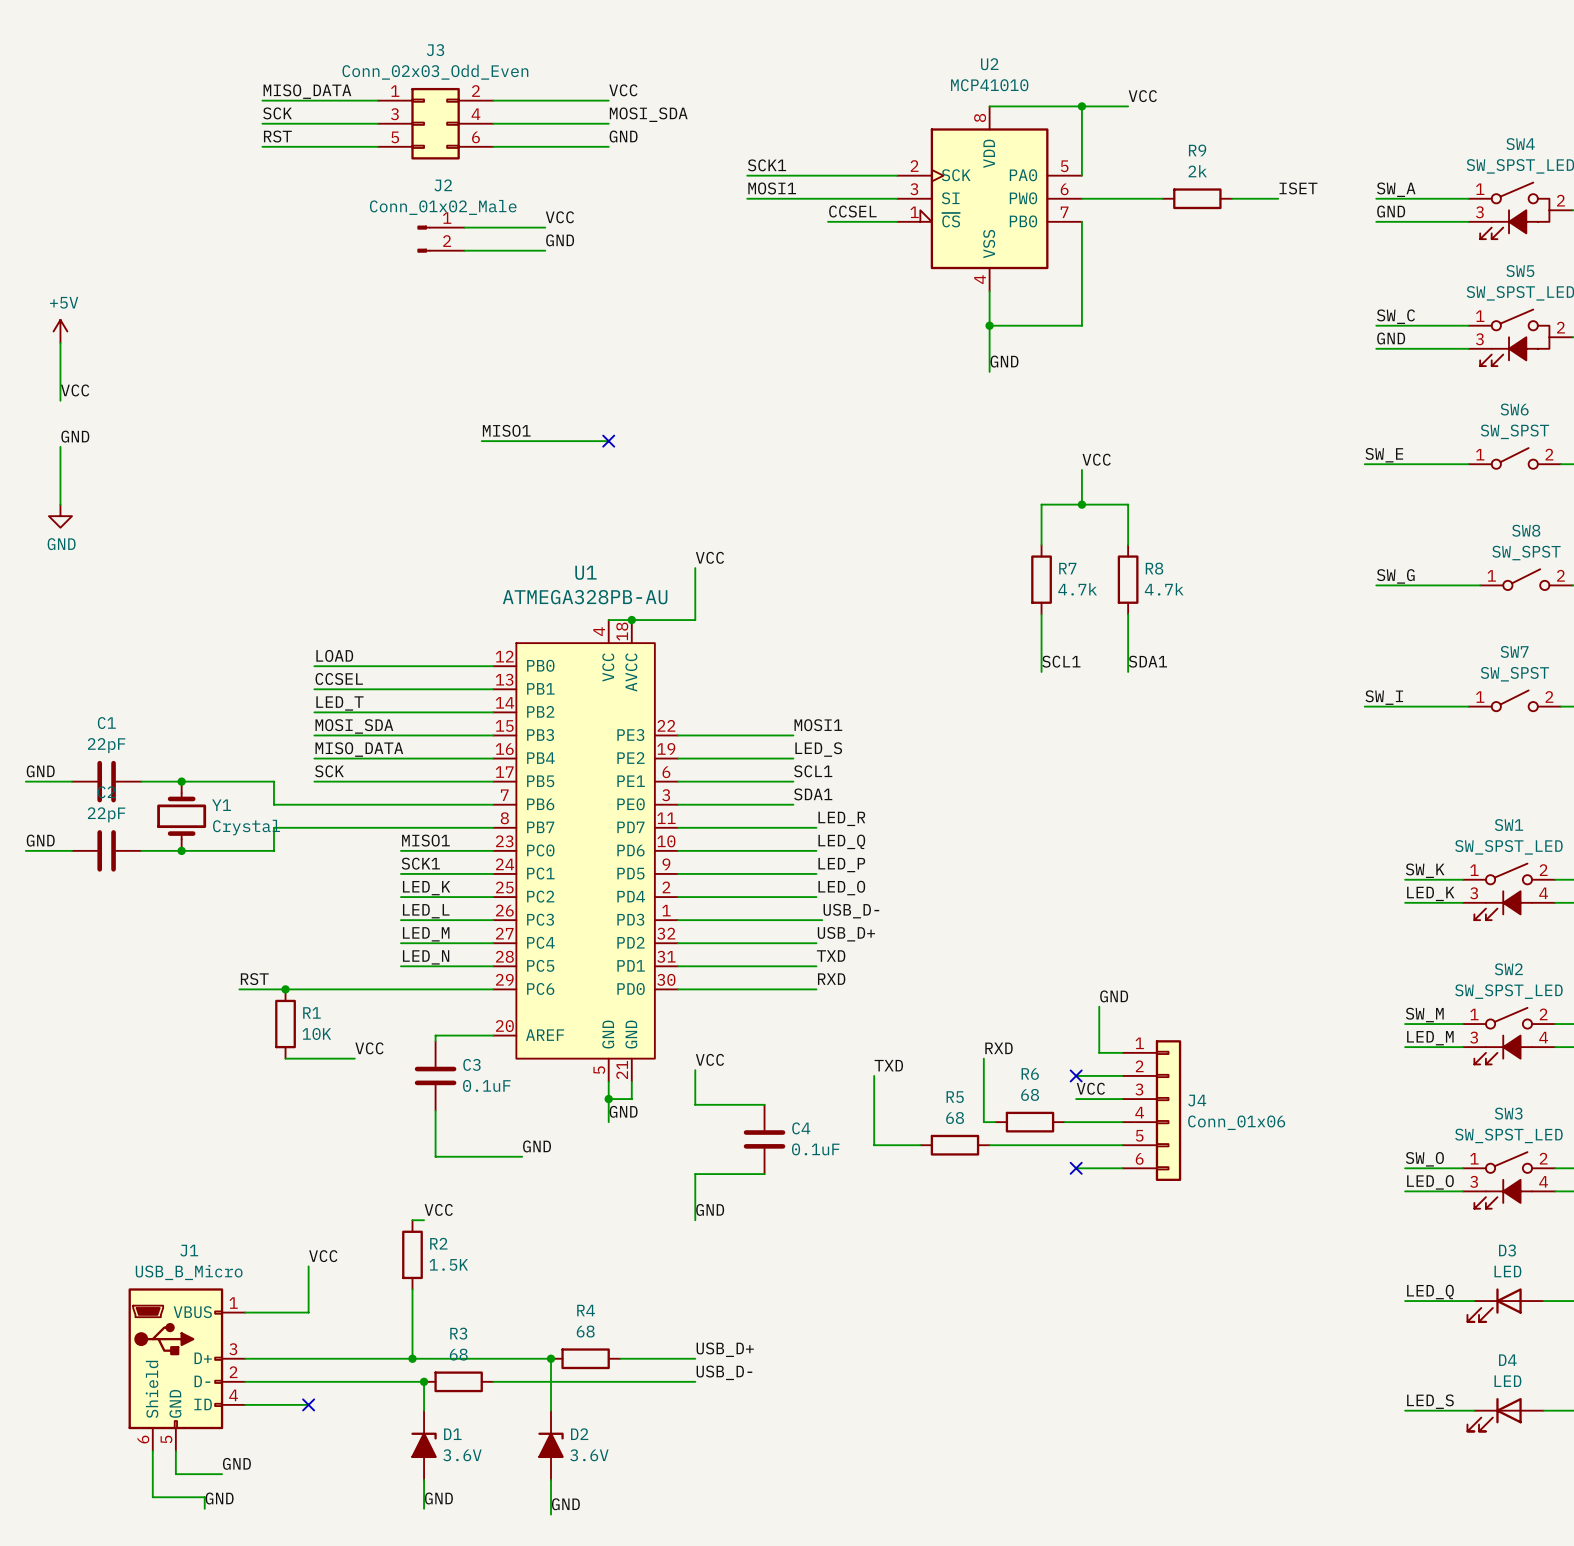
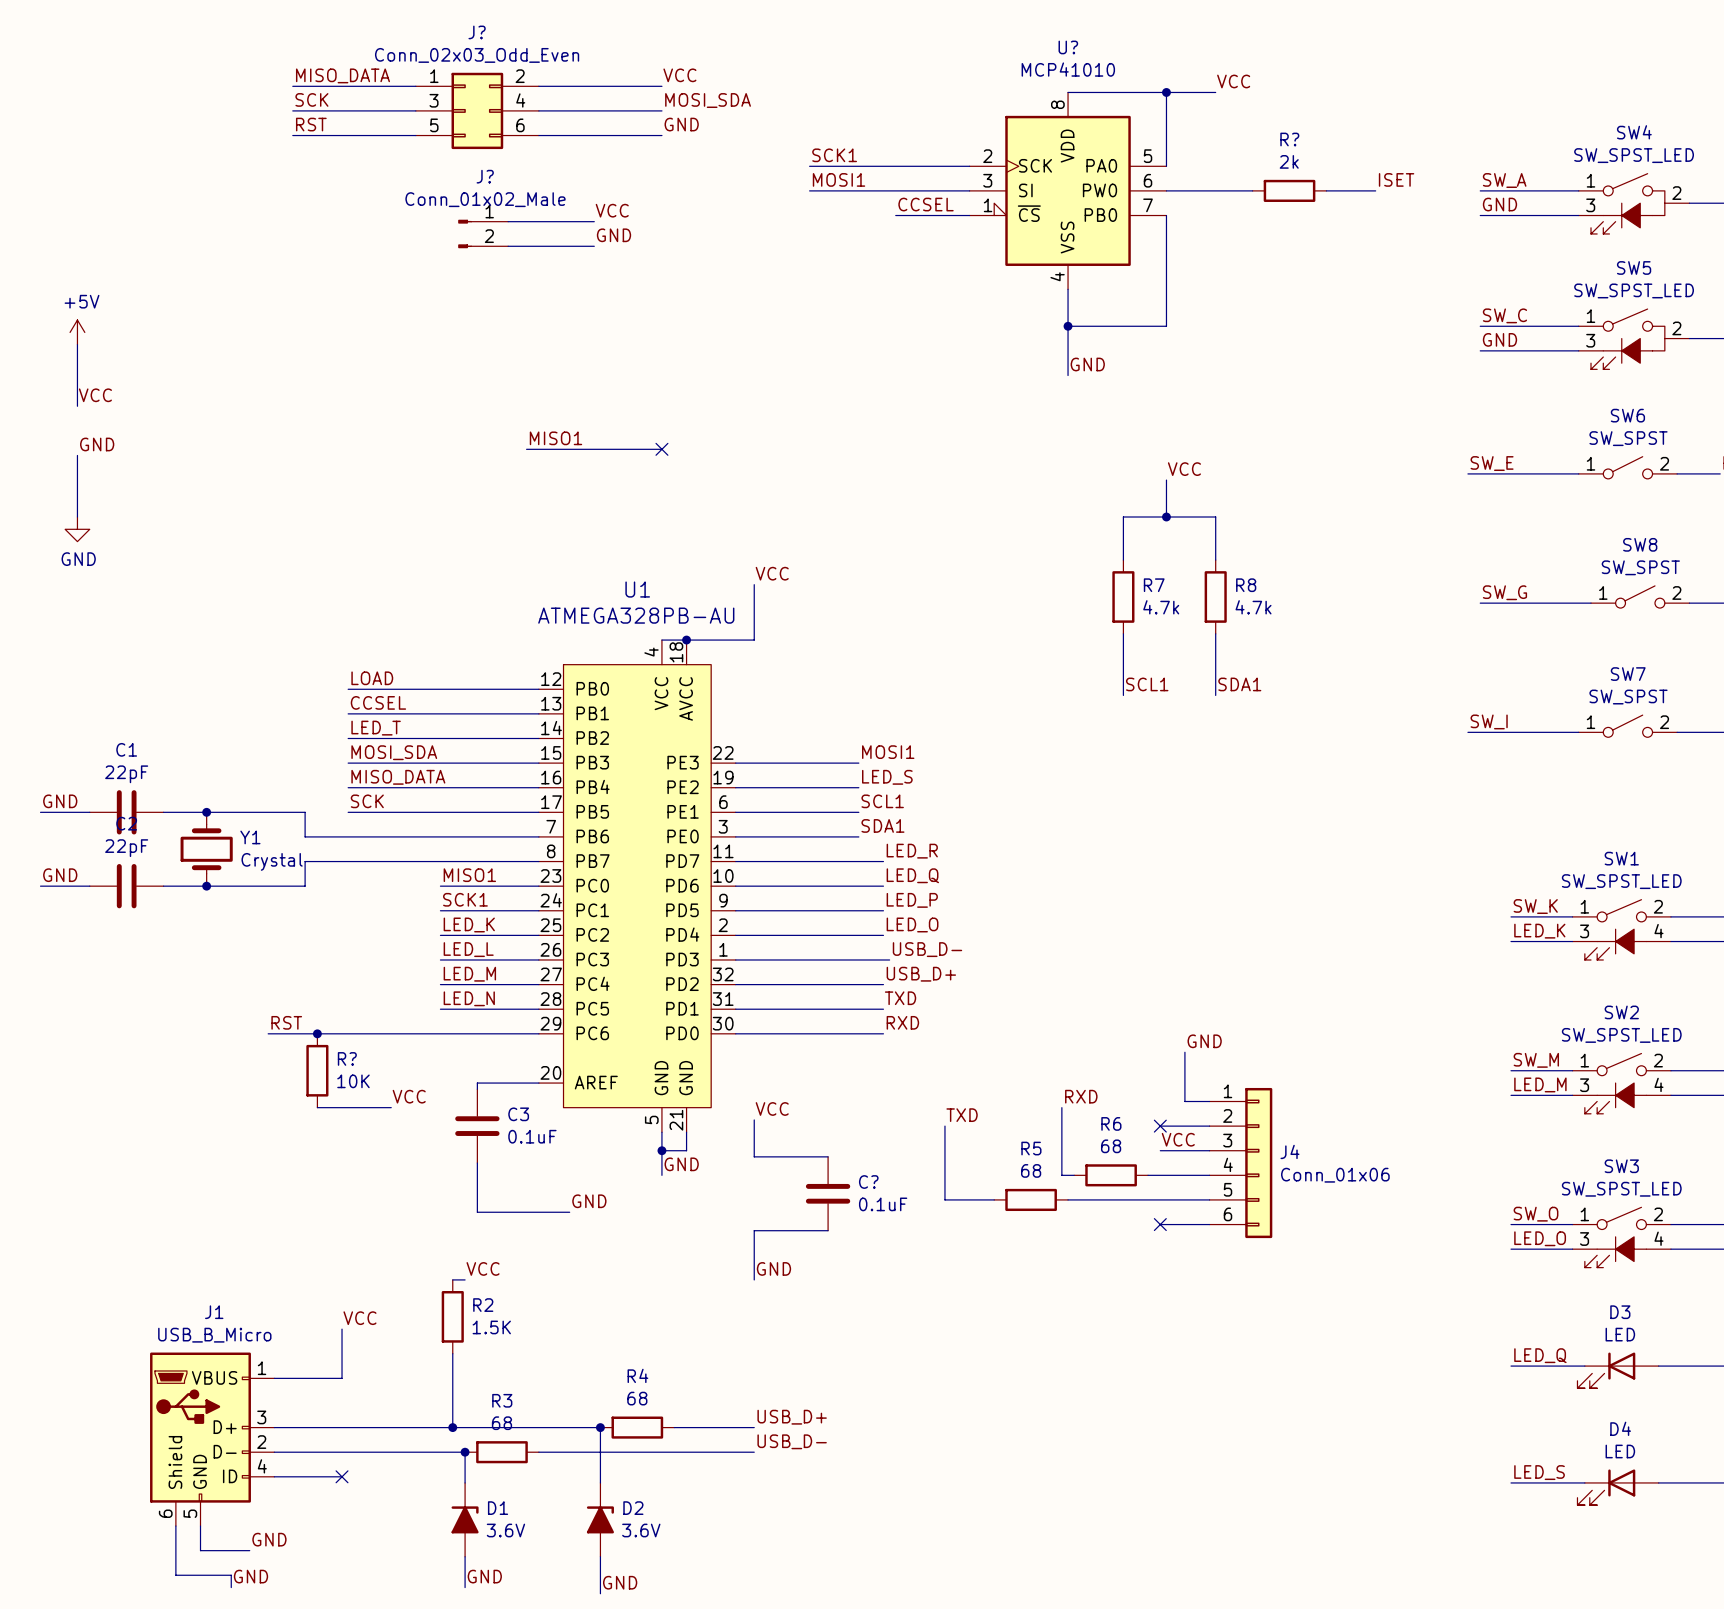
J3 name: J3 (435, 50) -> J? (477, 32)
U2 name: U2 (989, 64) -> U? (1068, 47)
R9 name: R9 (1197, 150) -> R? (1289, 139)
J2 name: J2 (443, 185) -> J? (485, 176)
R1 name: R1 (311, 1012) -> R? (347, 1058)
C4 name: C4 (801, 1128) -> C? (868, 1182)

